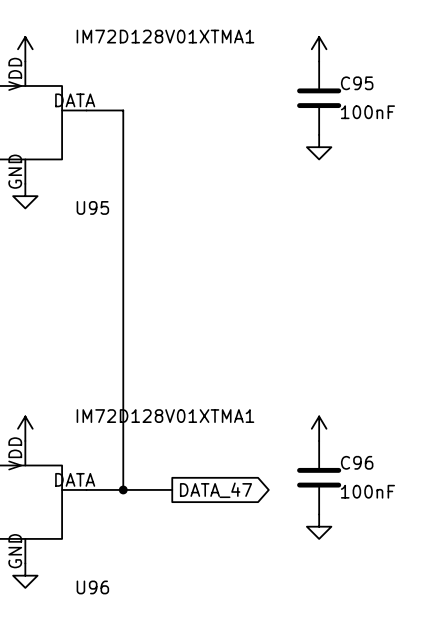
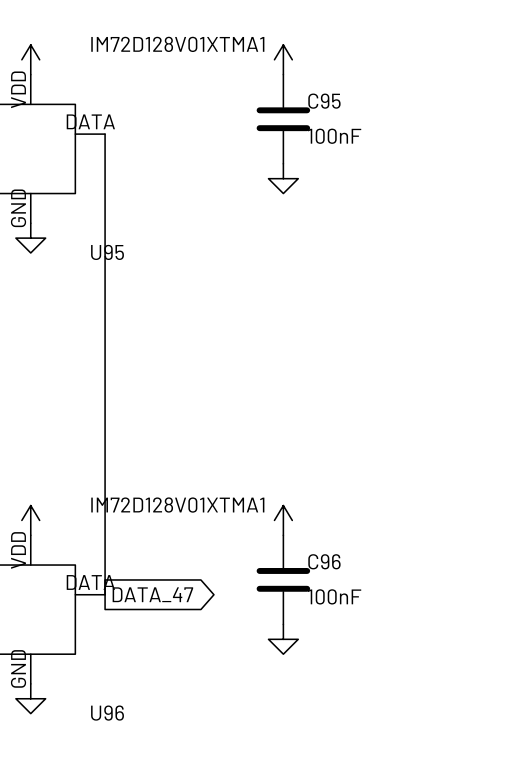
power symbol position: (319, 49) -> (283, 59)
C95 position: (319, 98) -> (283, 119)
wire: (86, 110) (123, 110) (123, 489) -> (105, 134) (105, 594)
power symbol position: (319, 147) -> (283, 178)
power symbol position: (319, 428) -> (283, 520)
C96 position: (319, 477) -> (283, 579)
wire: (86, 489) (172, 489) -> none
junction: (123, 489) -> none
global label position: DATA_47 (215, 490) -> DATA_47 (152, 594)
power symbol position: (319, 526) -> (283, 639)

